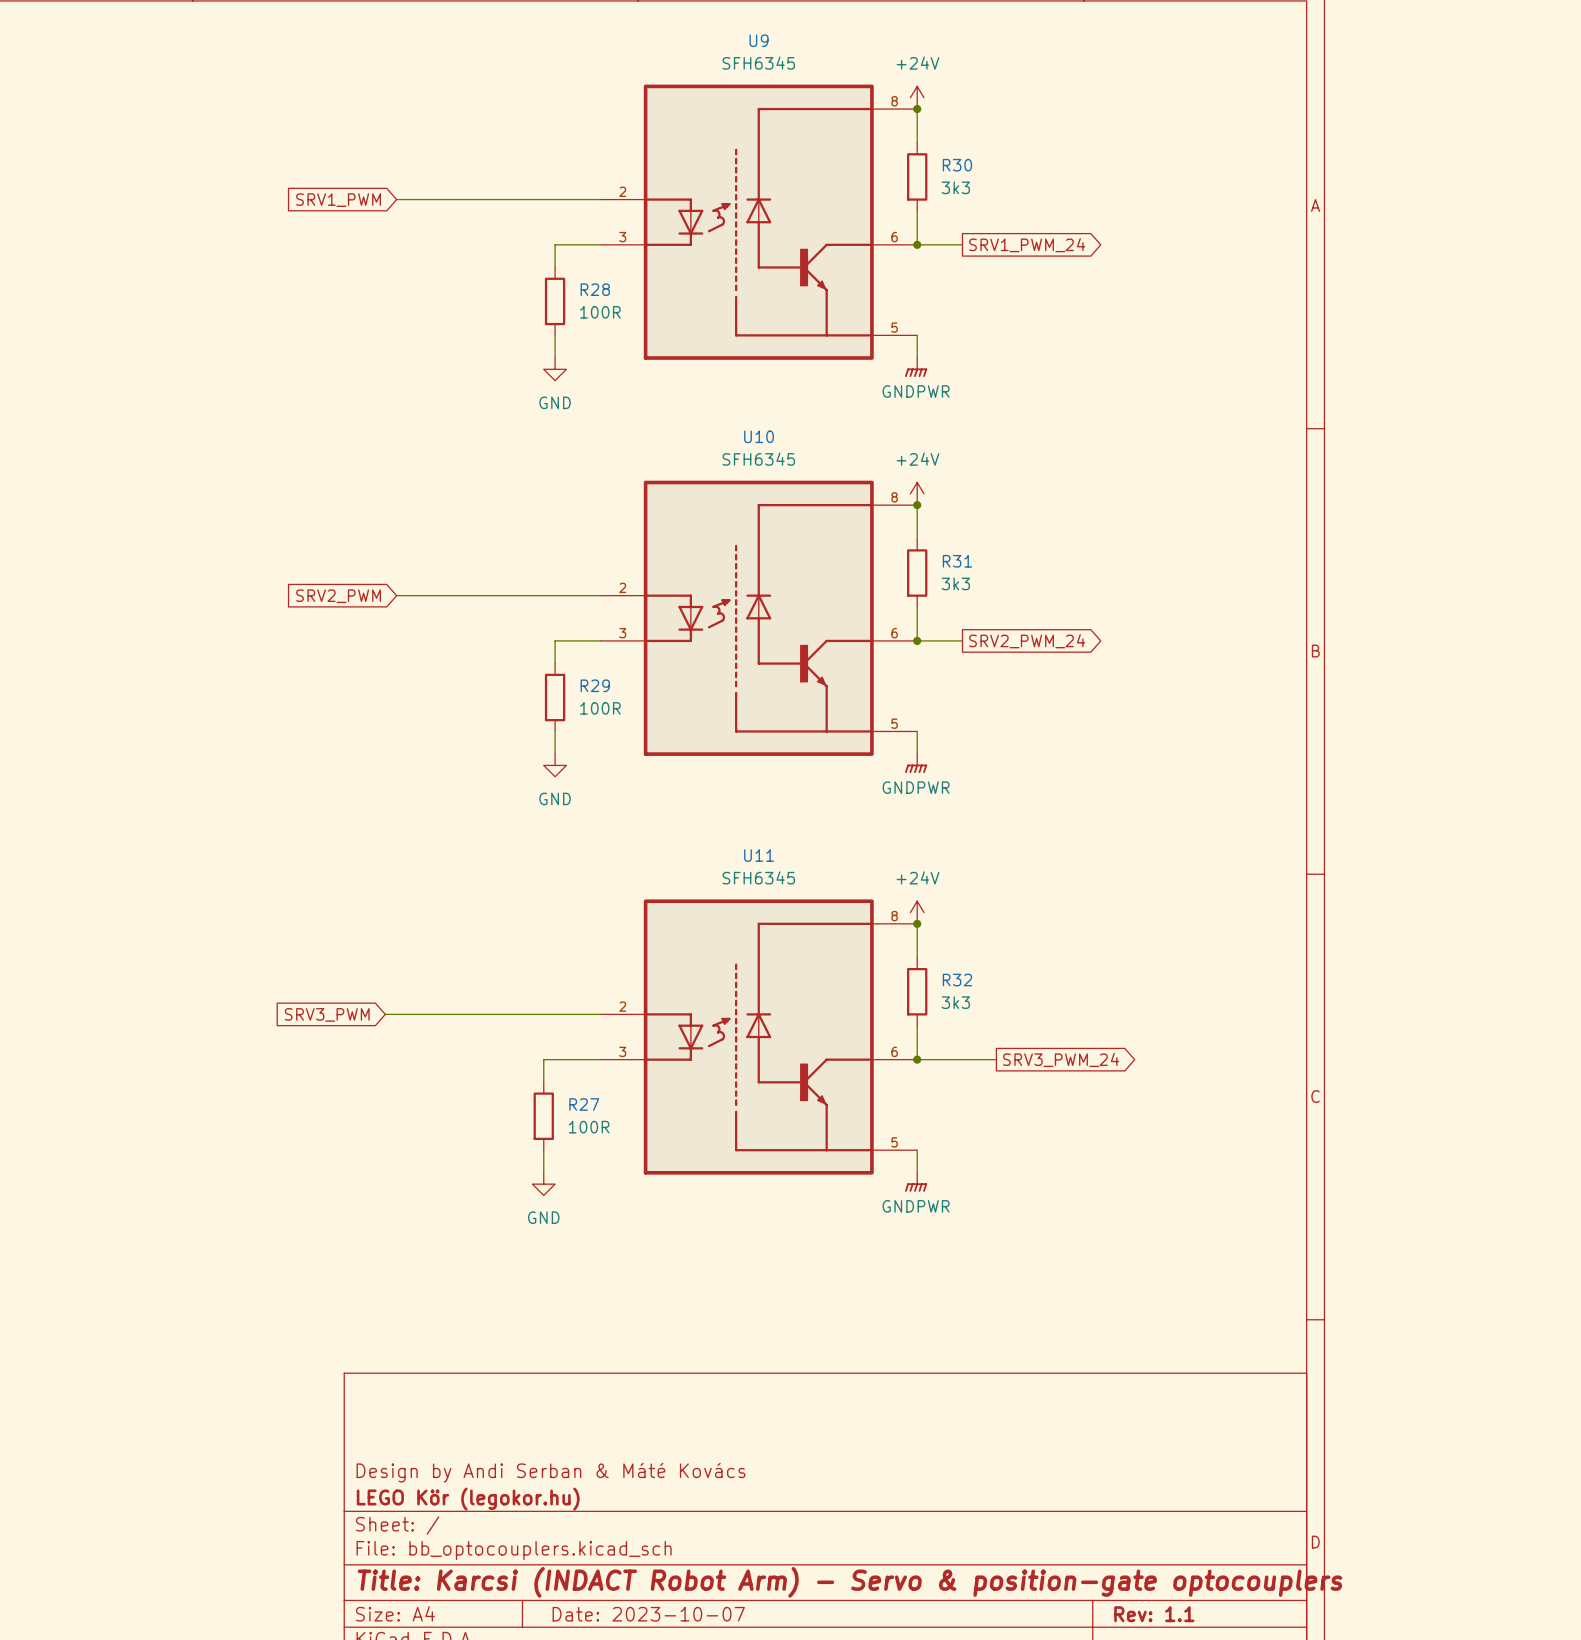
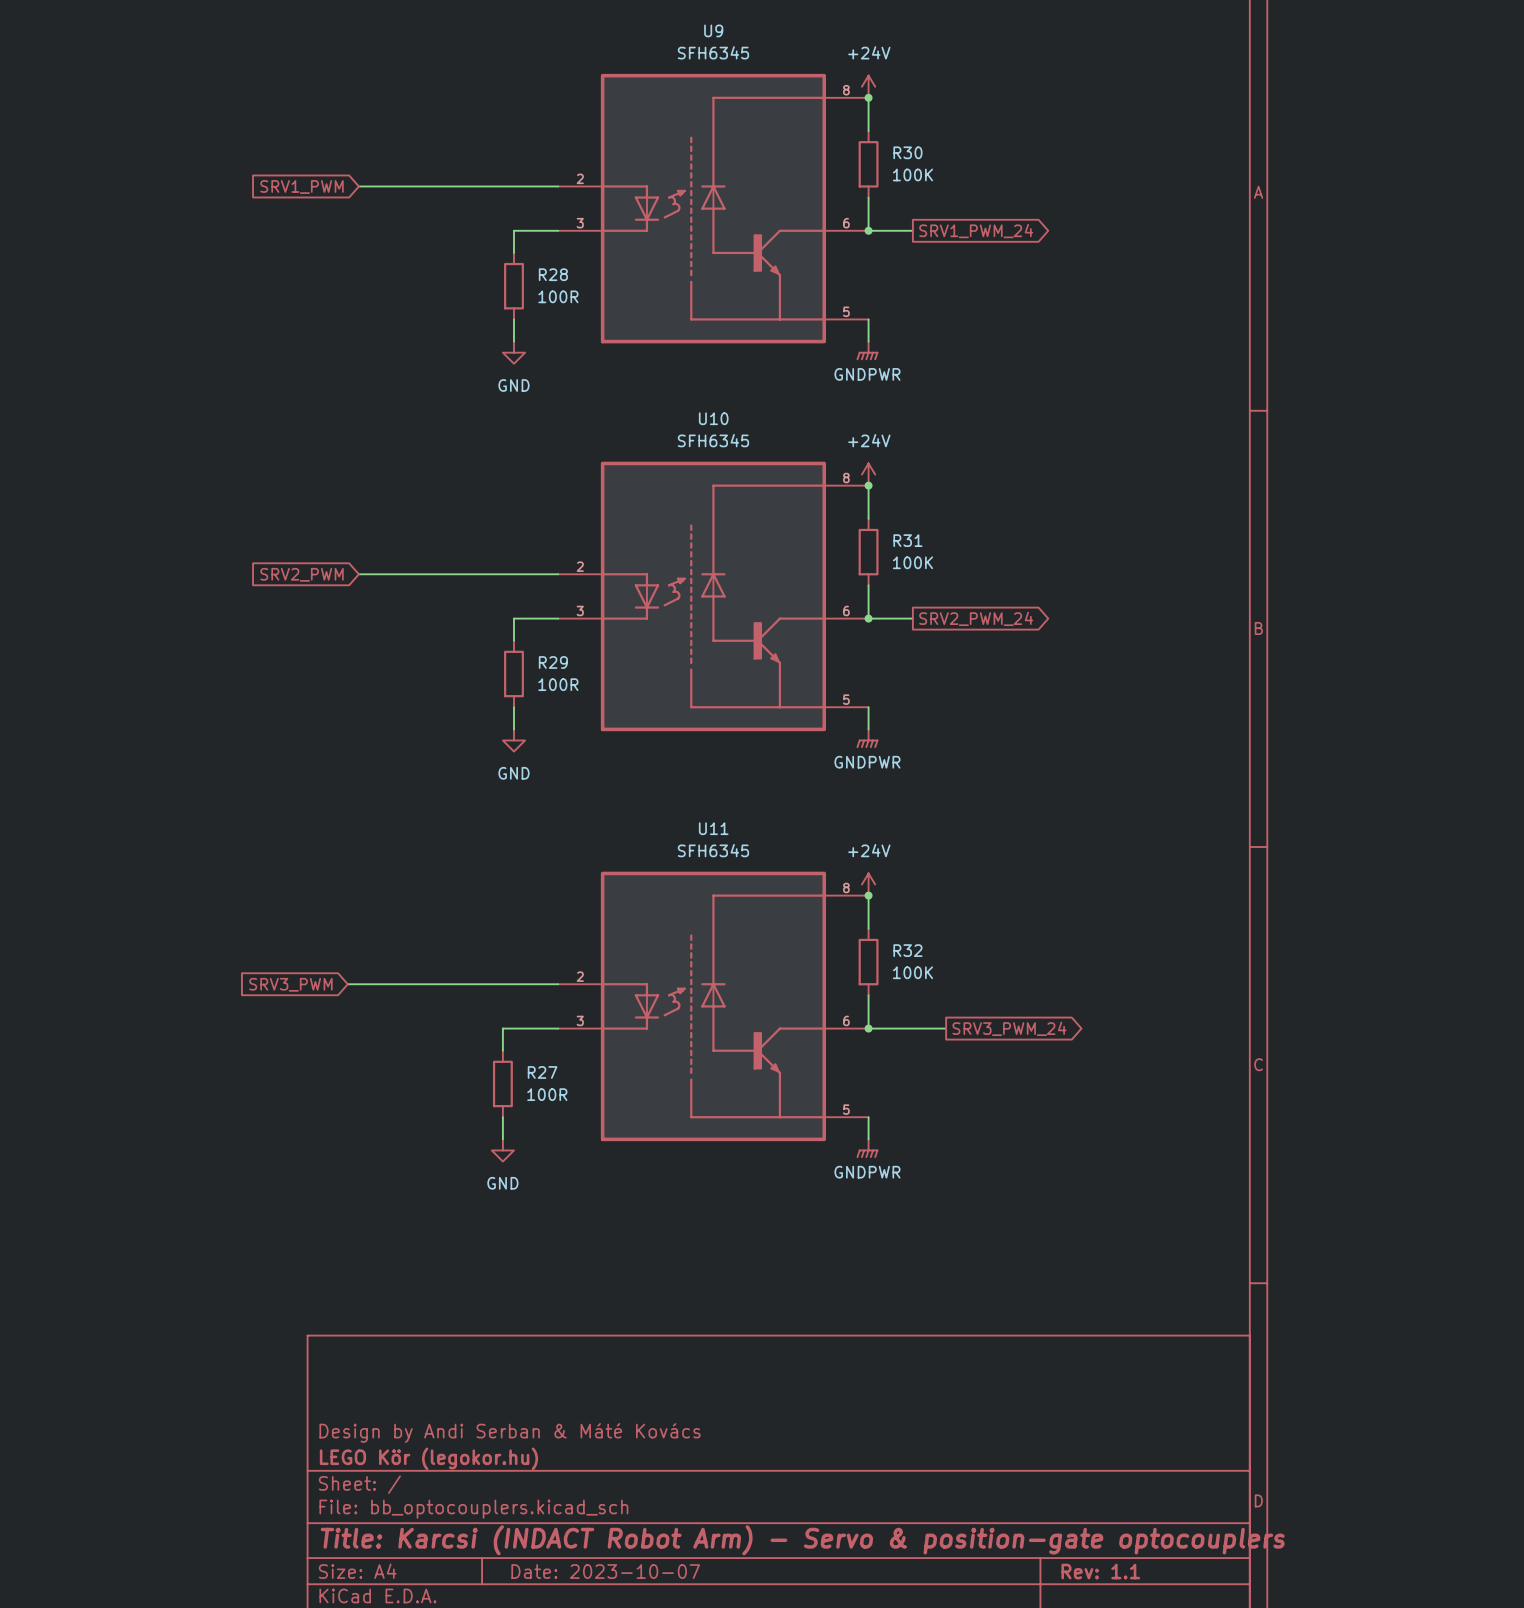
R30 value: 3k3 (955, 187) -> 100K (912, 174)
R31 value: 3k3 (955, 583) -> 100K (912, 562)
R32 value: 3k3 (955, 1002) -> 100K (912, 972)

